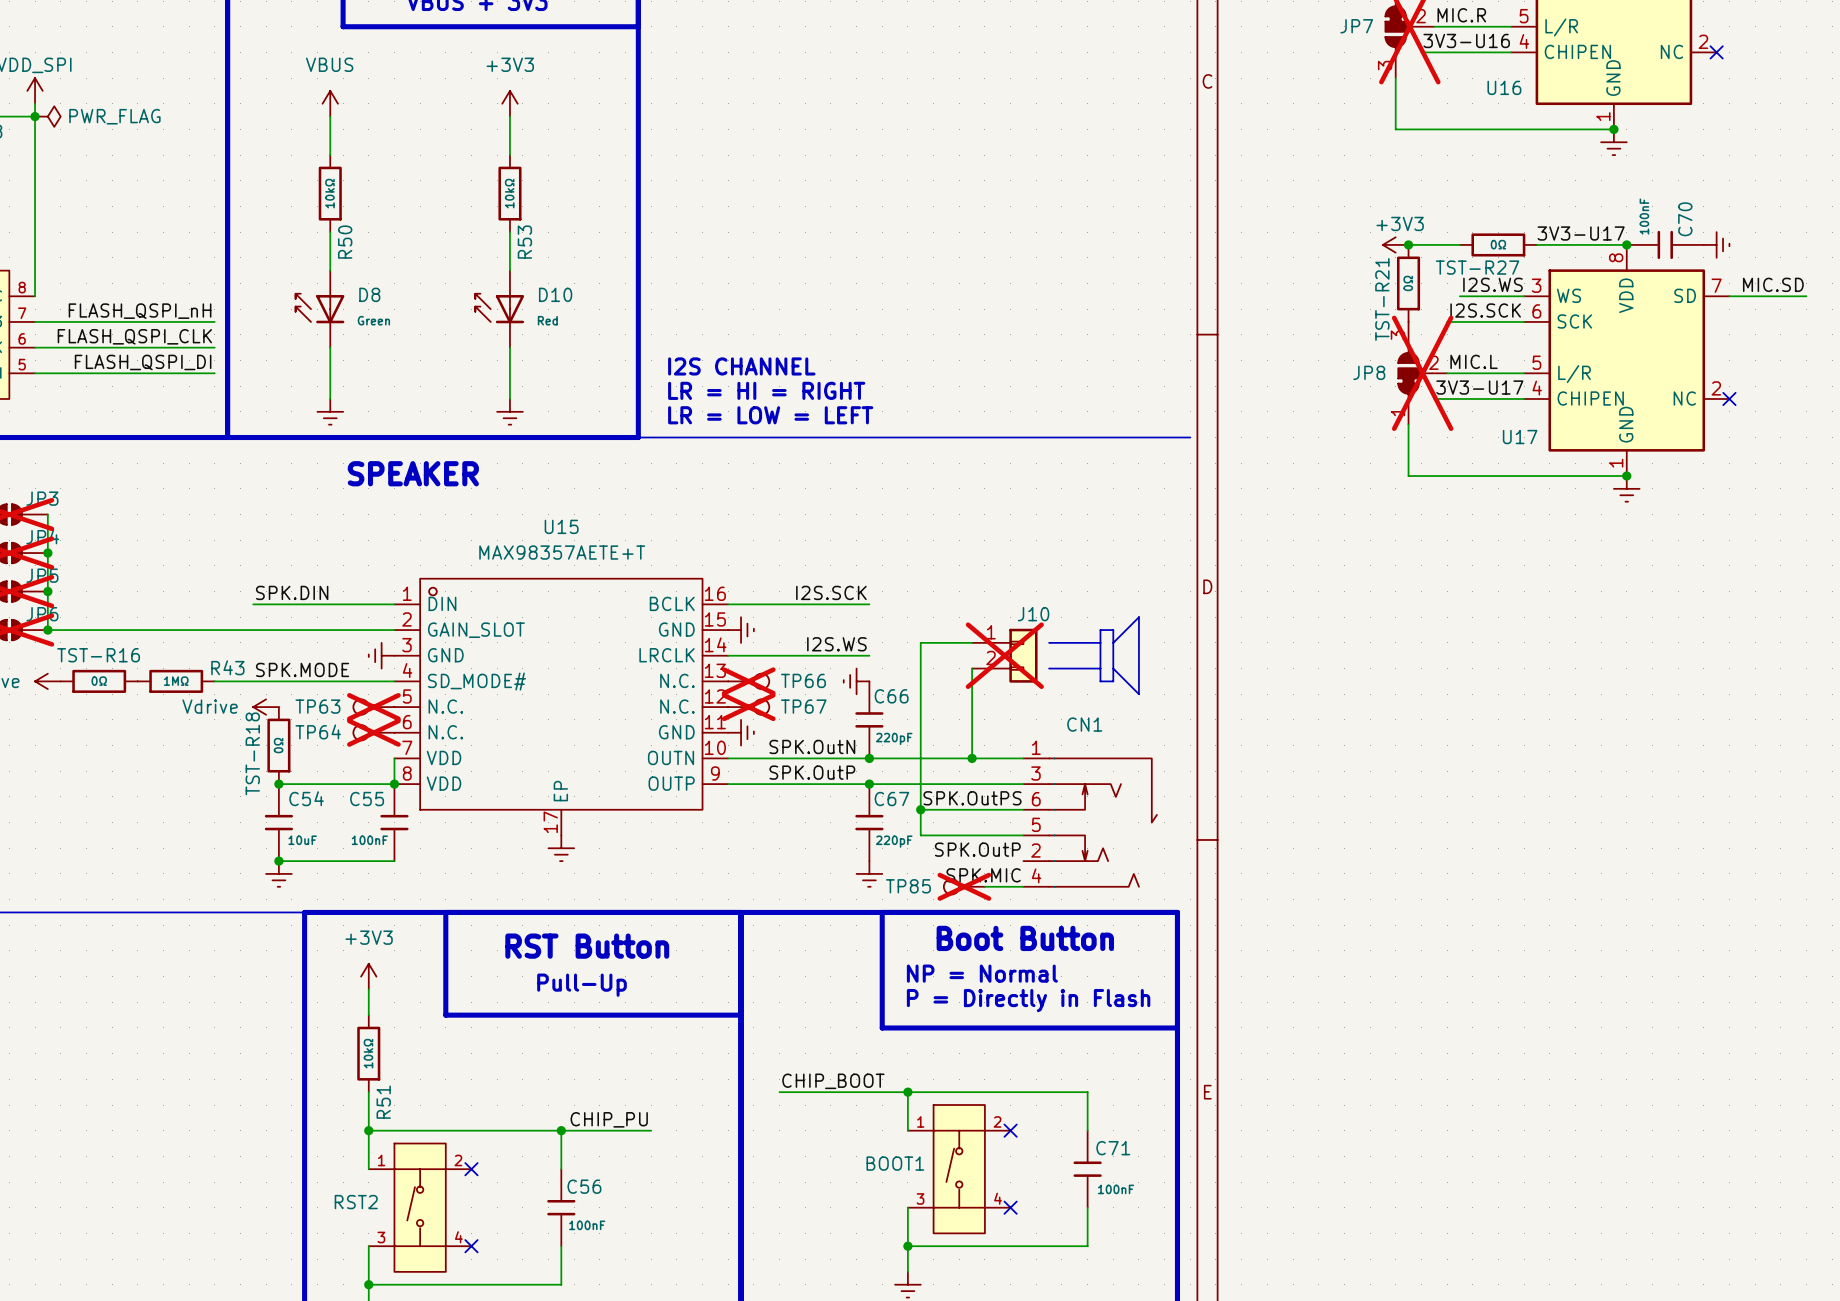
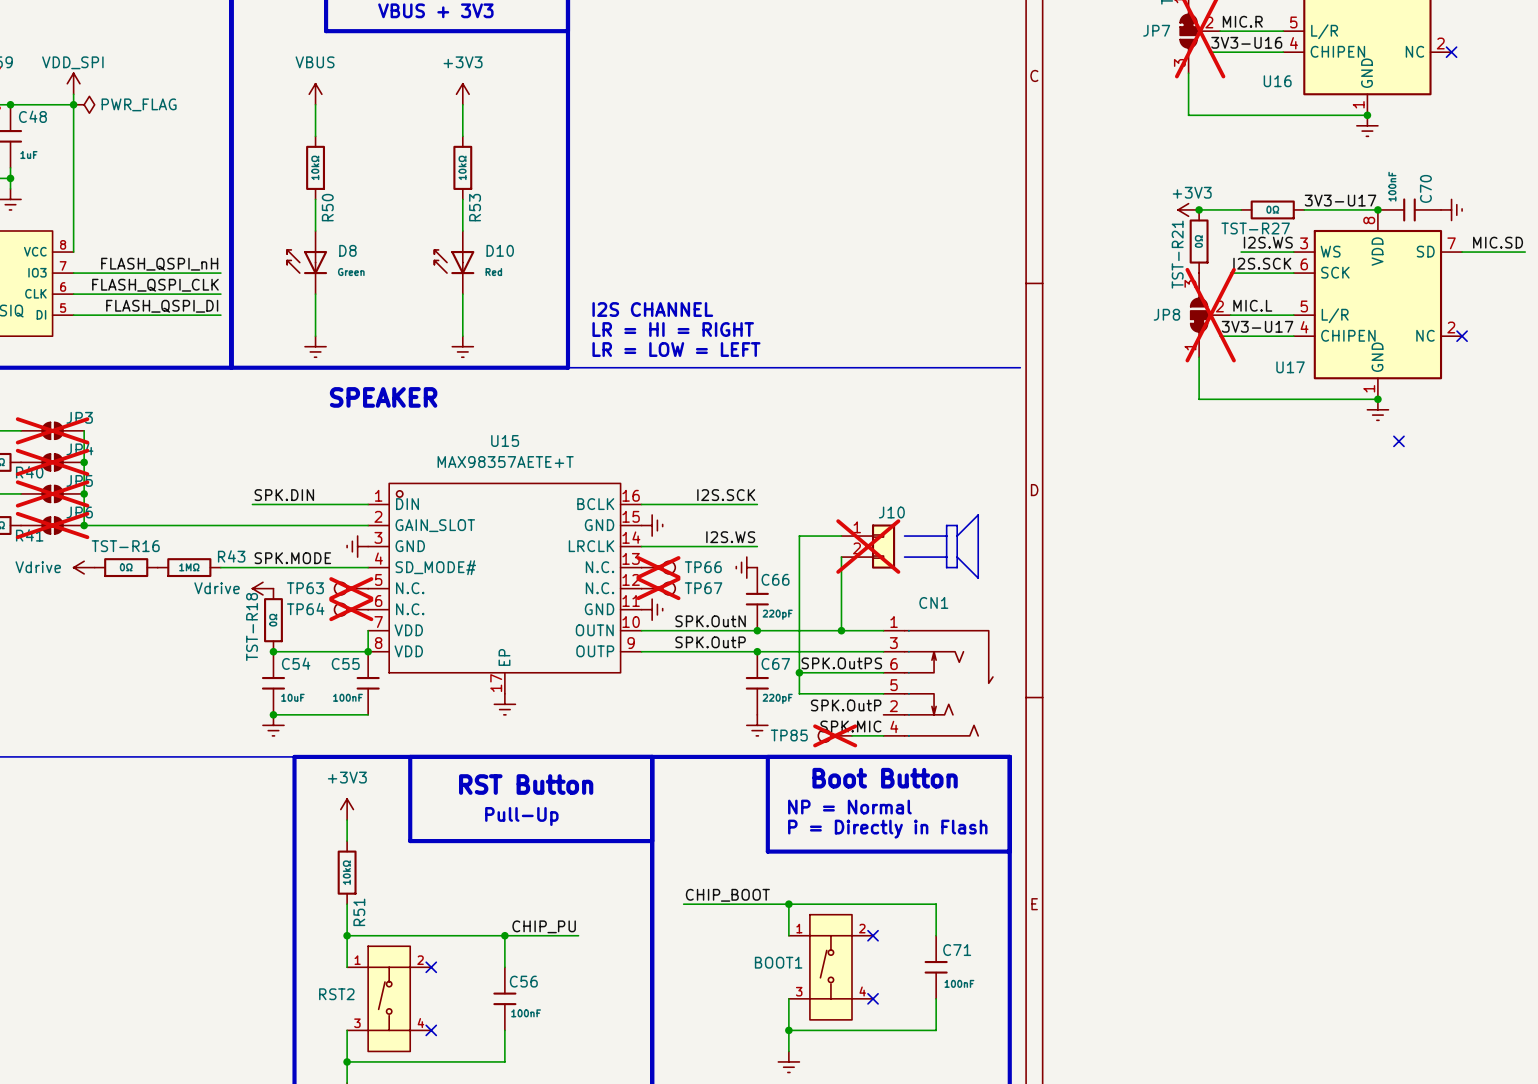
no-connect mark: none -> (1398, 441)

